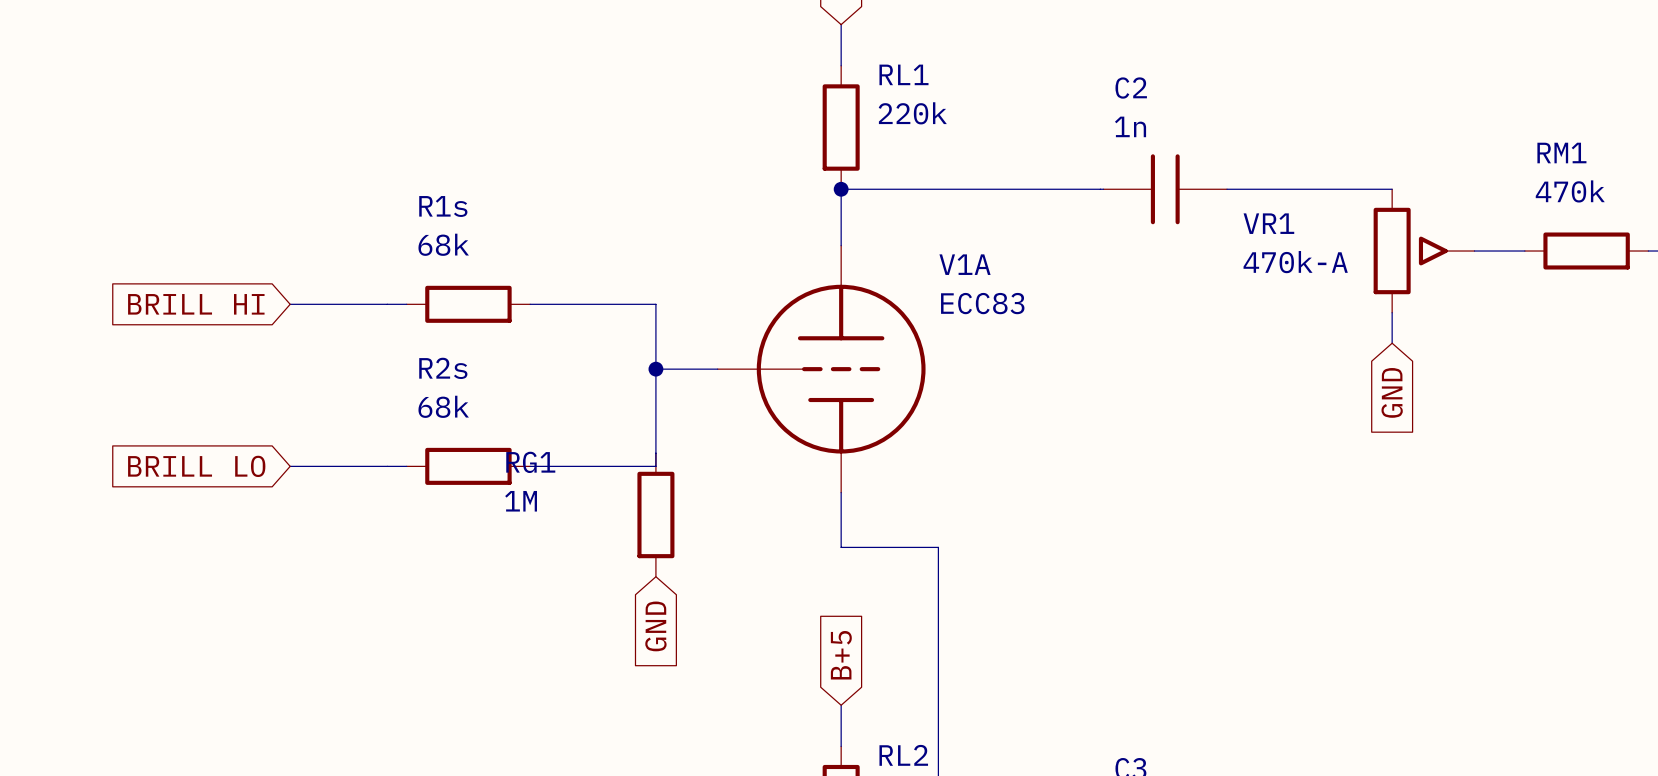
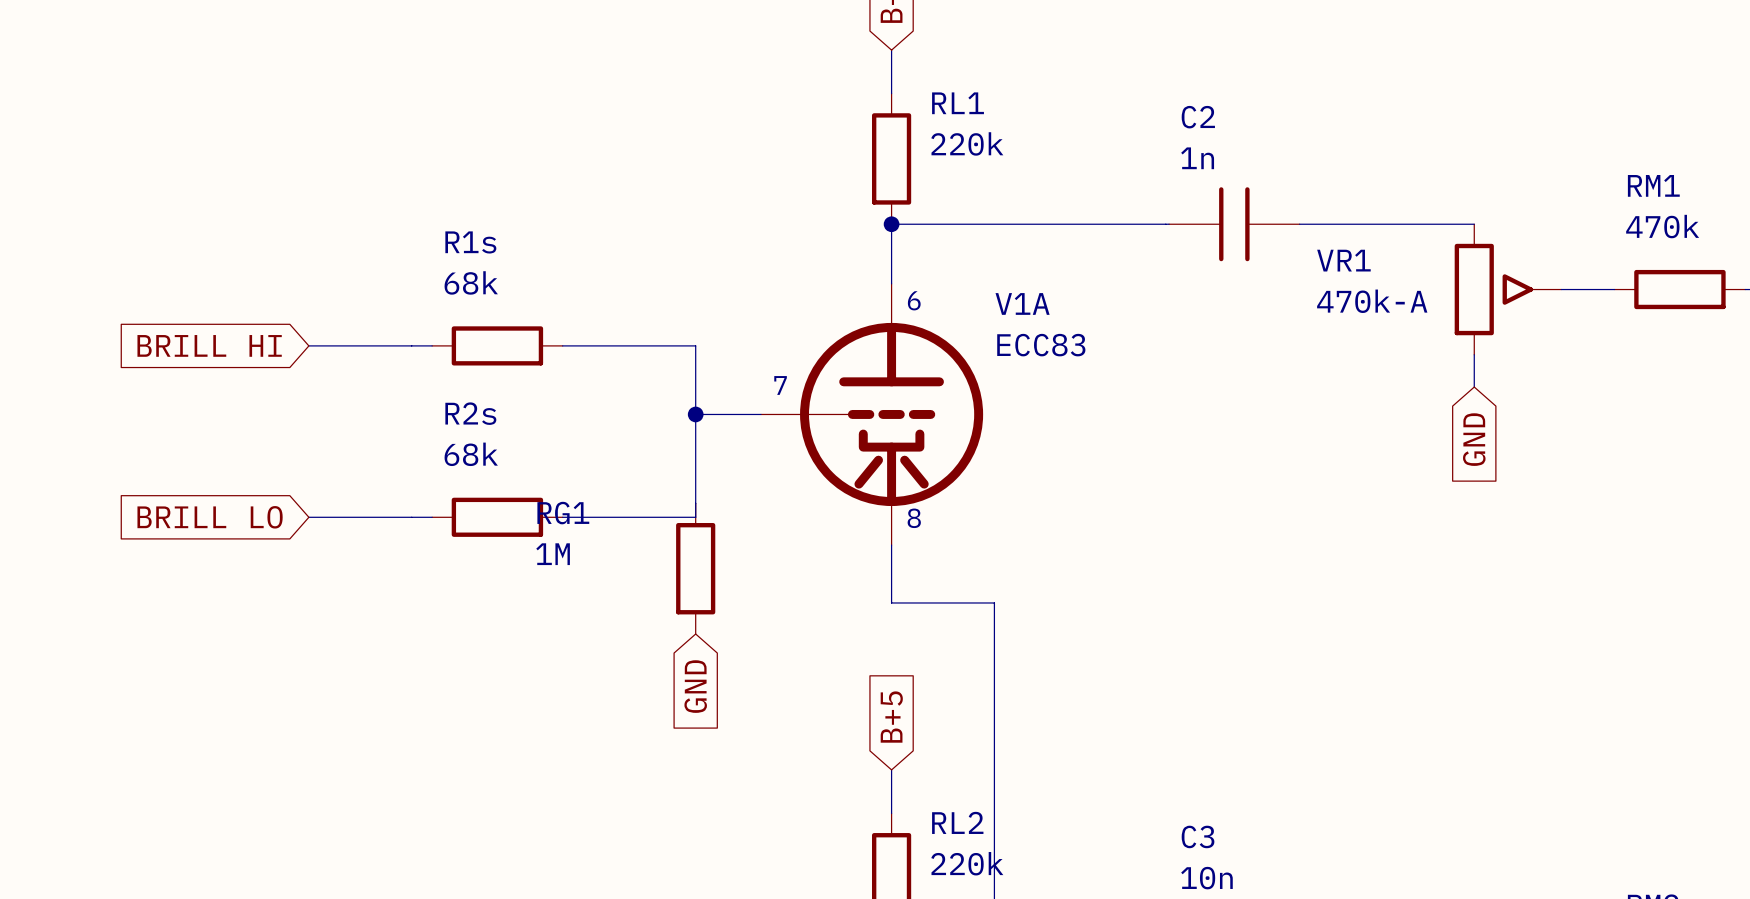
V1A symbol: [717, 245, 926, 493] -> [760, 283, 984, 546]
text: none -> 6 (914, 300)
text: none -> 7 (780, 385)
text: none -> 8 (914, 518)

